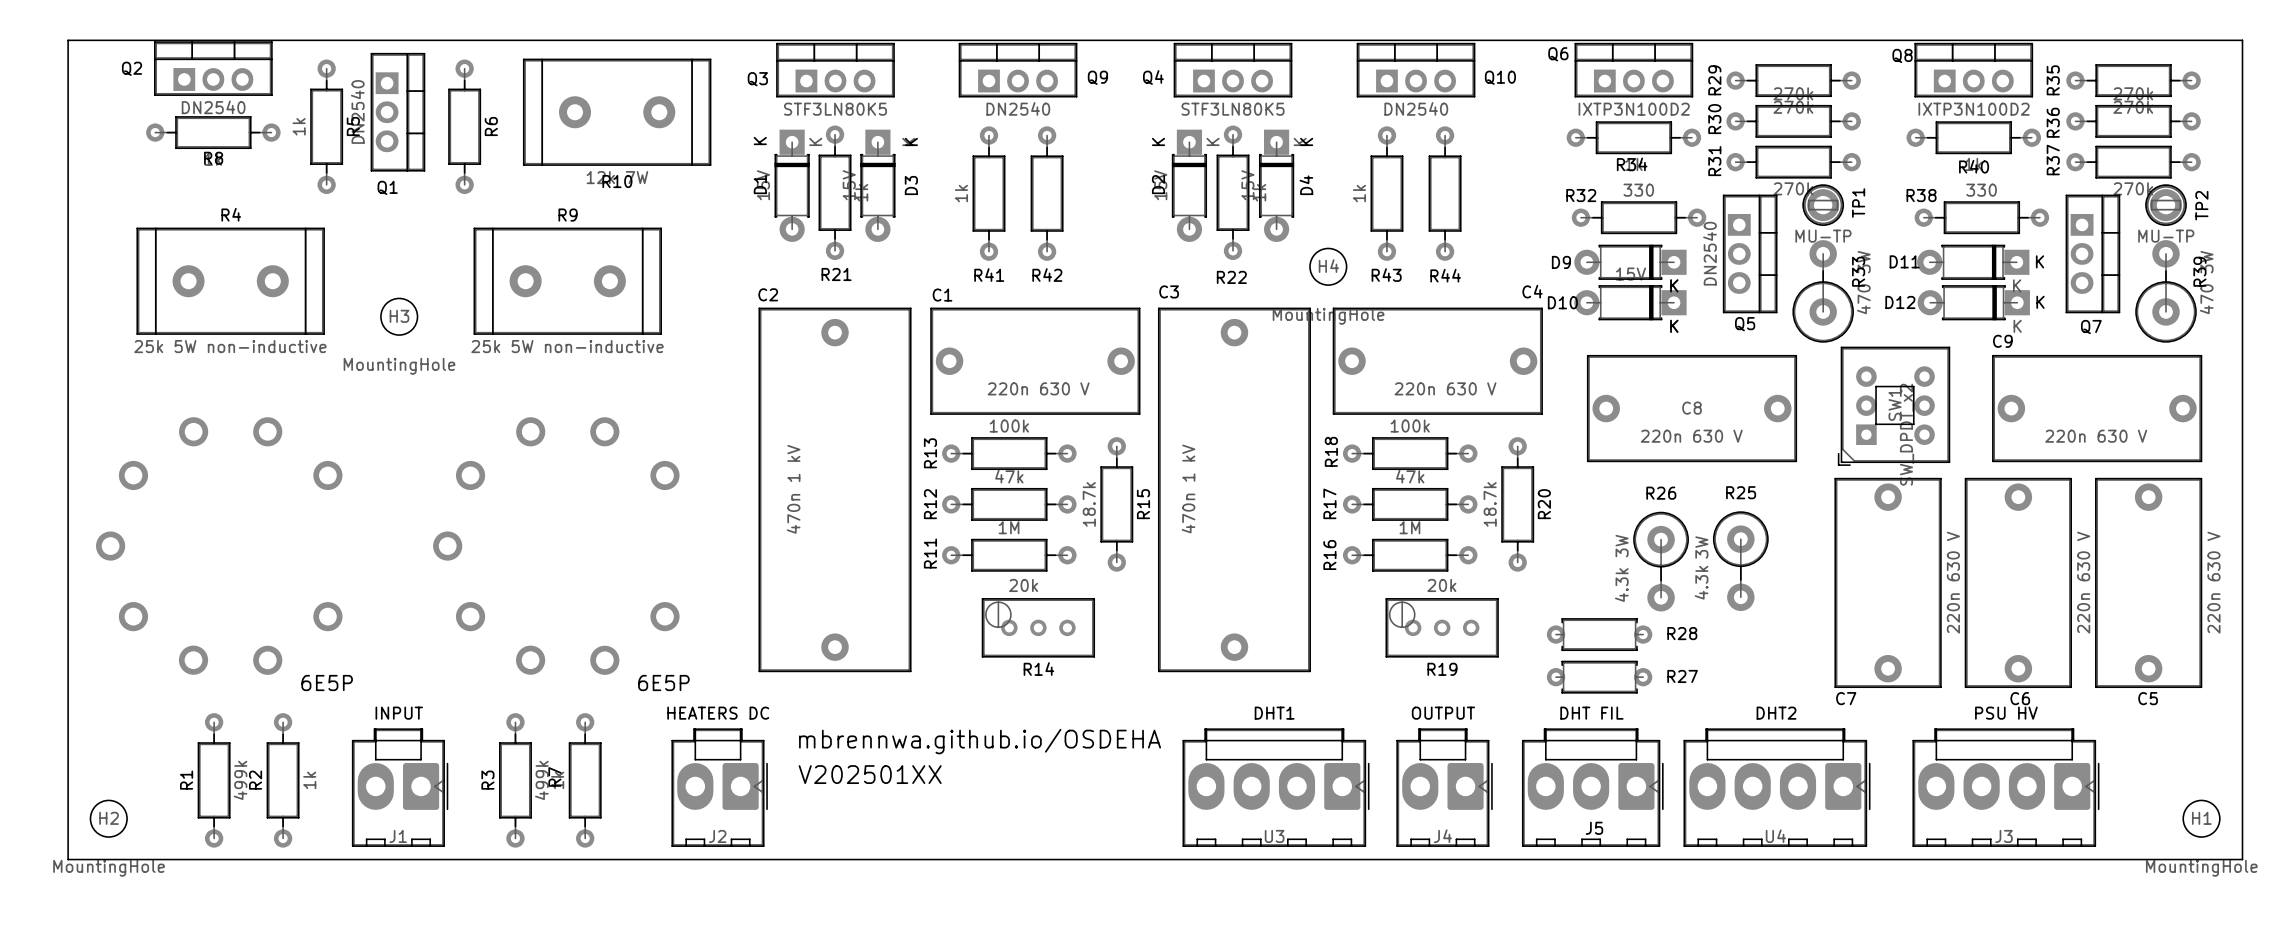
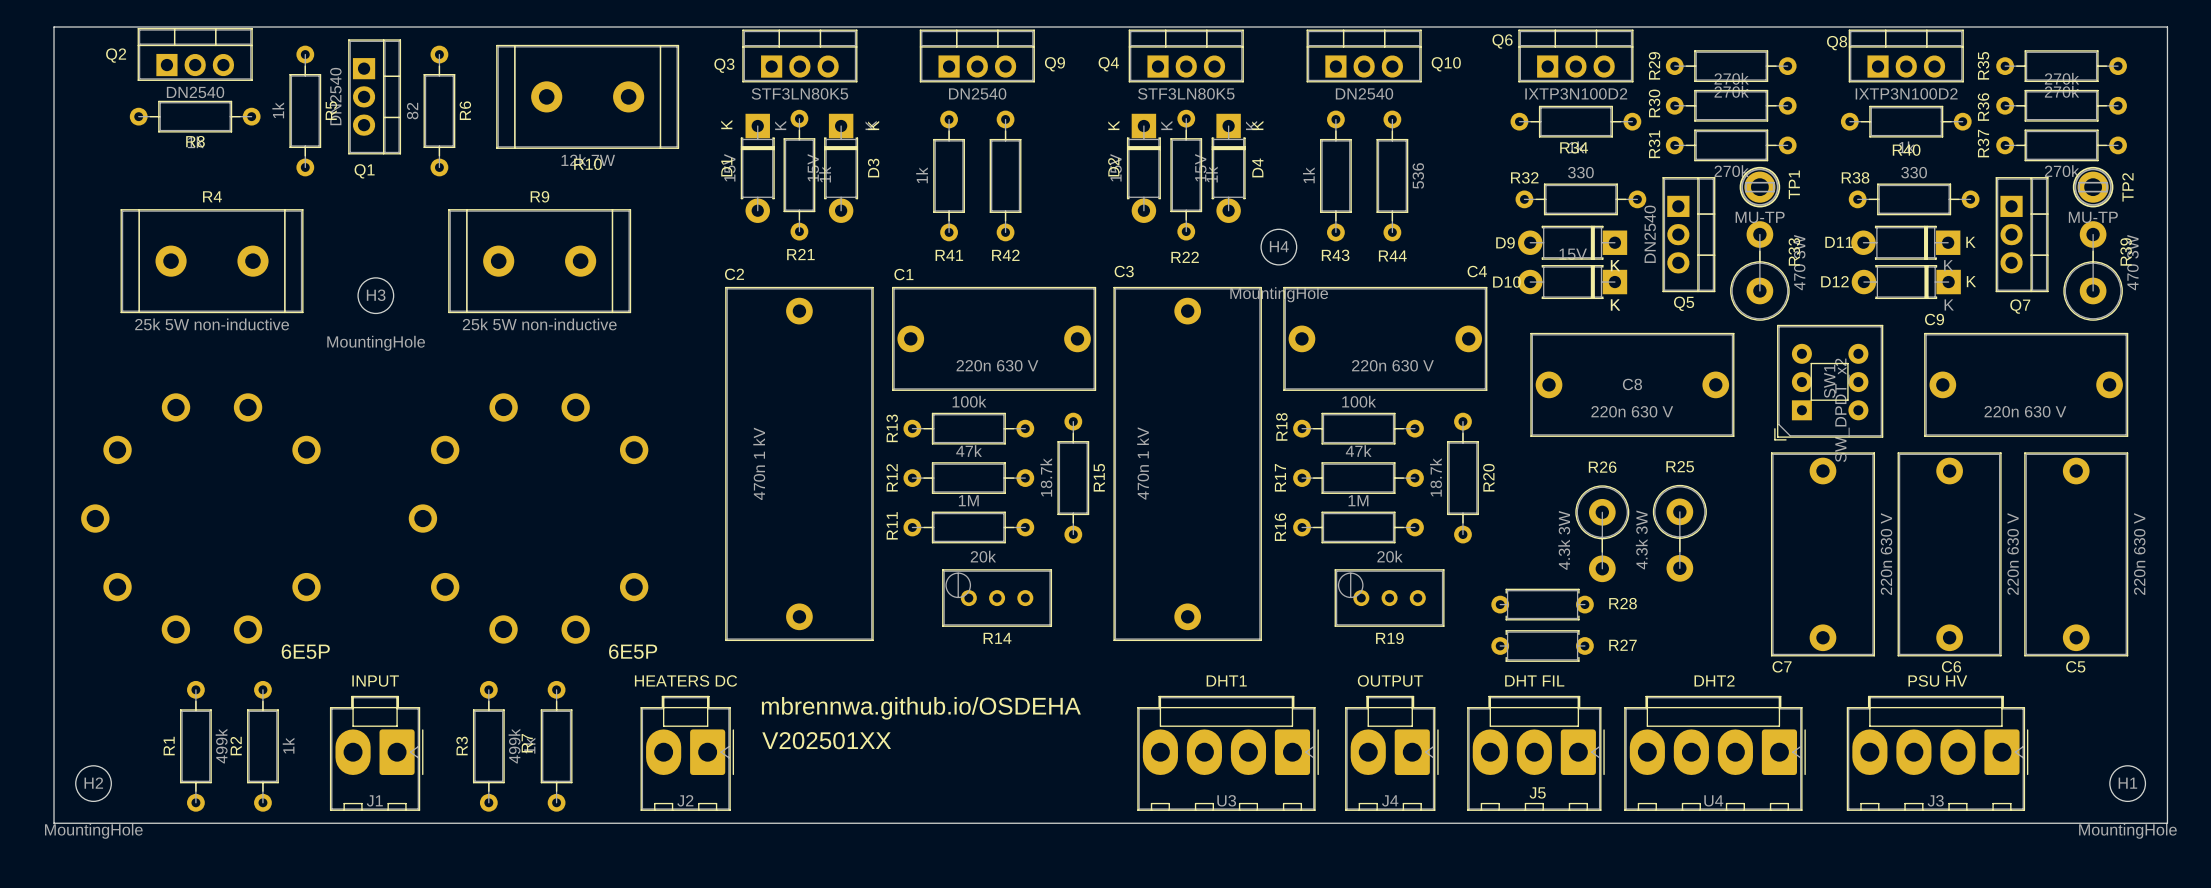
R6 value: none -> 82 (412, 111)
R44 value: none -> 536 (1418, 175)

